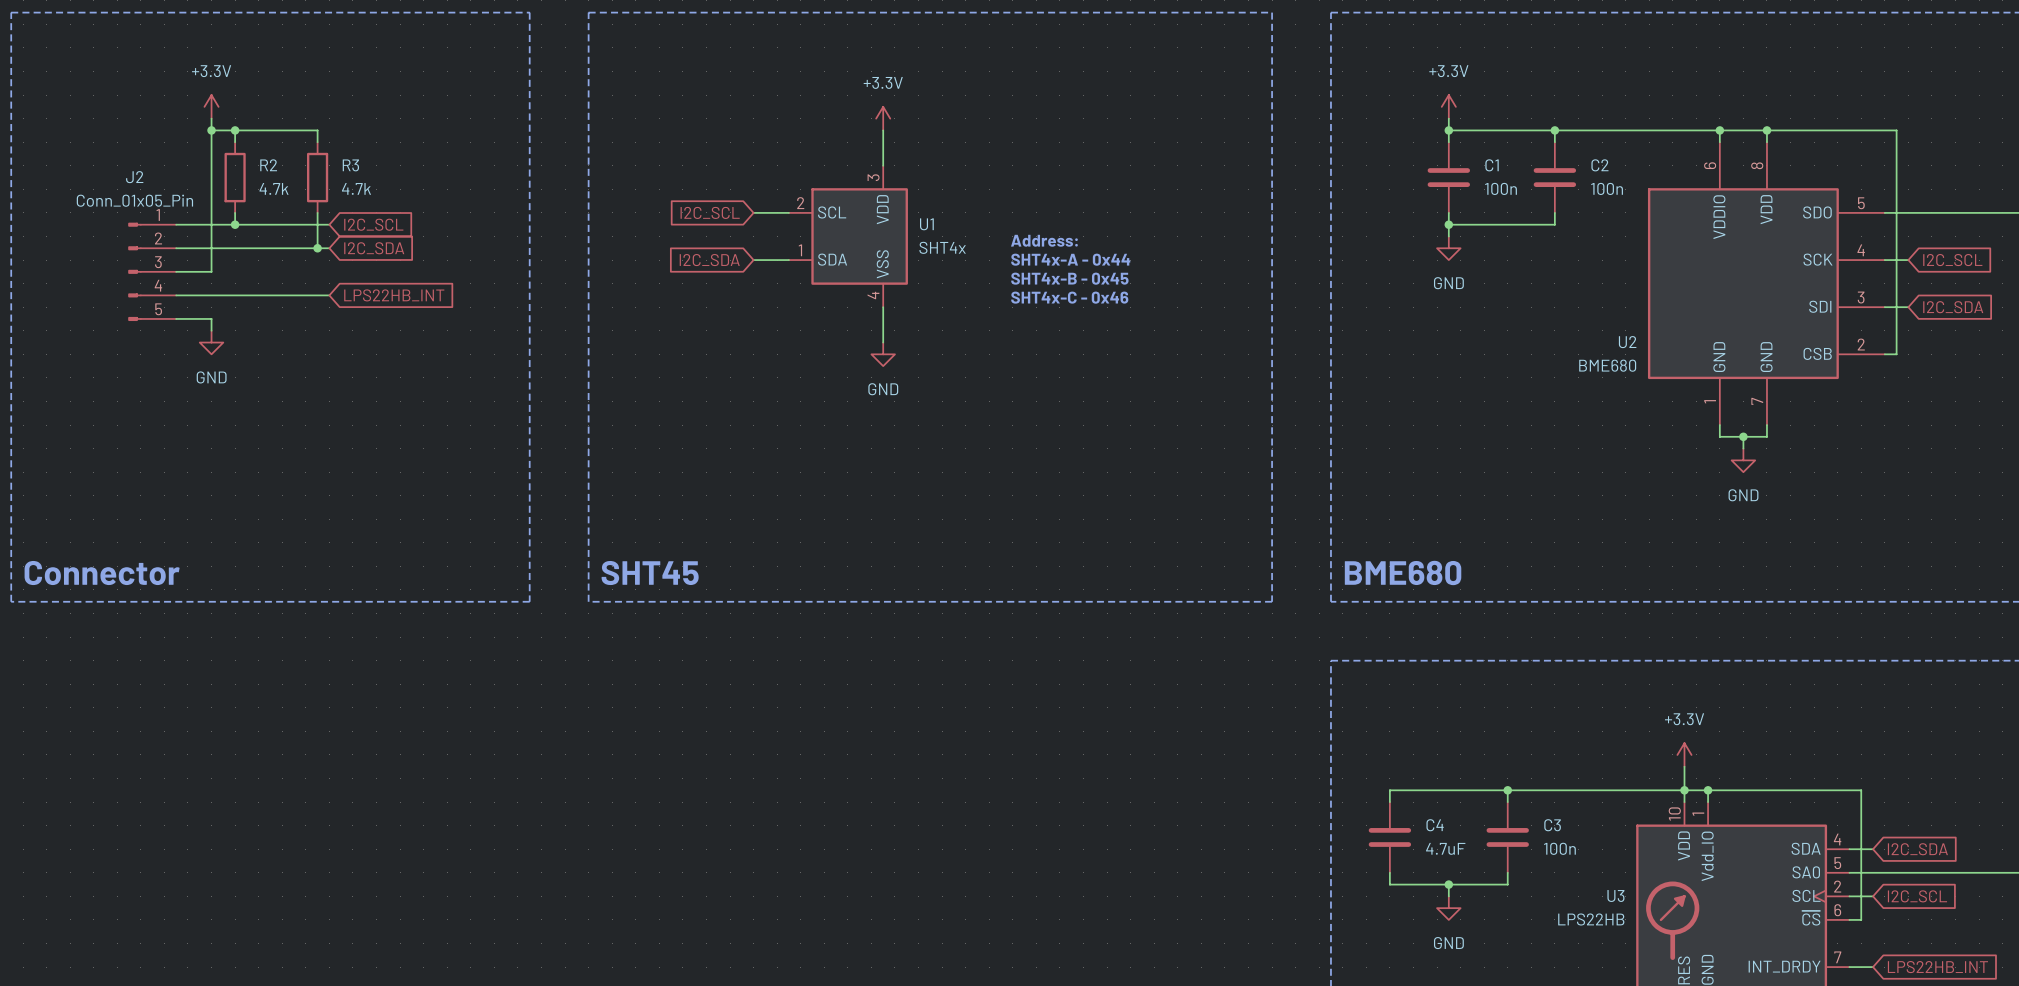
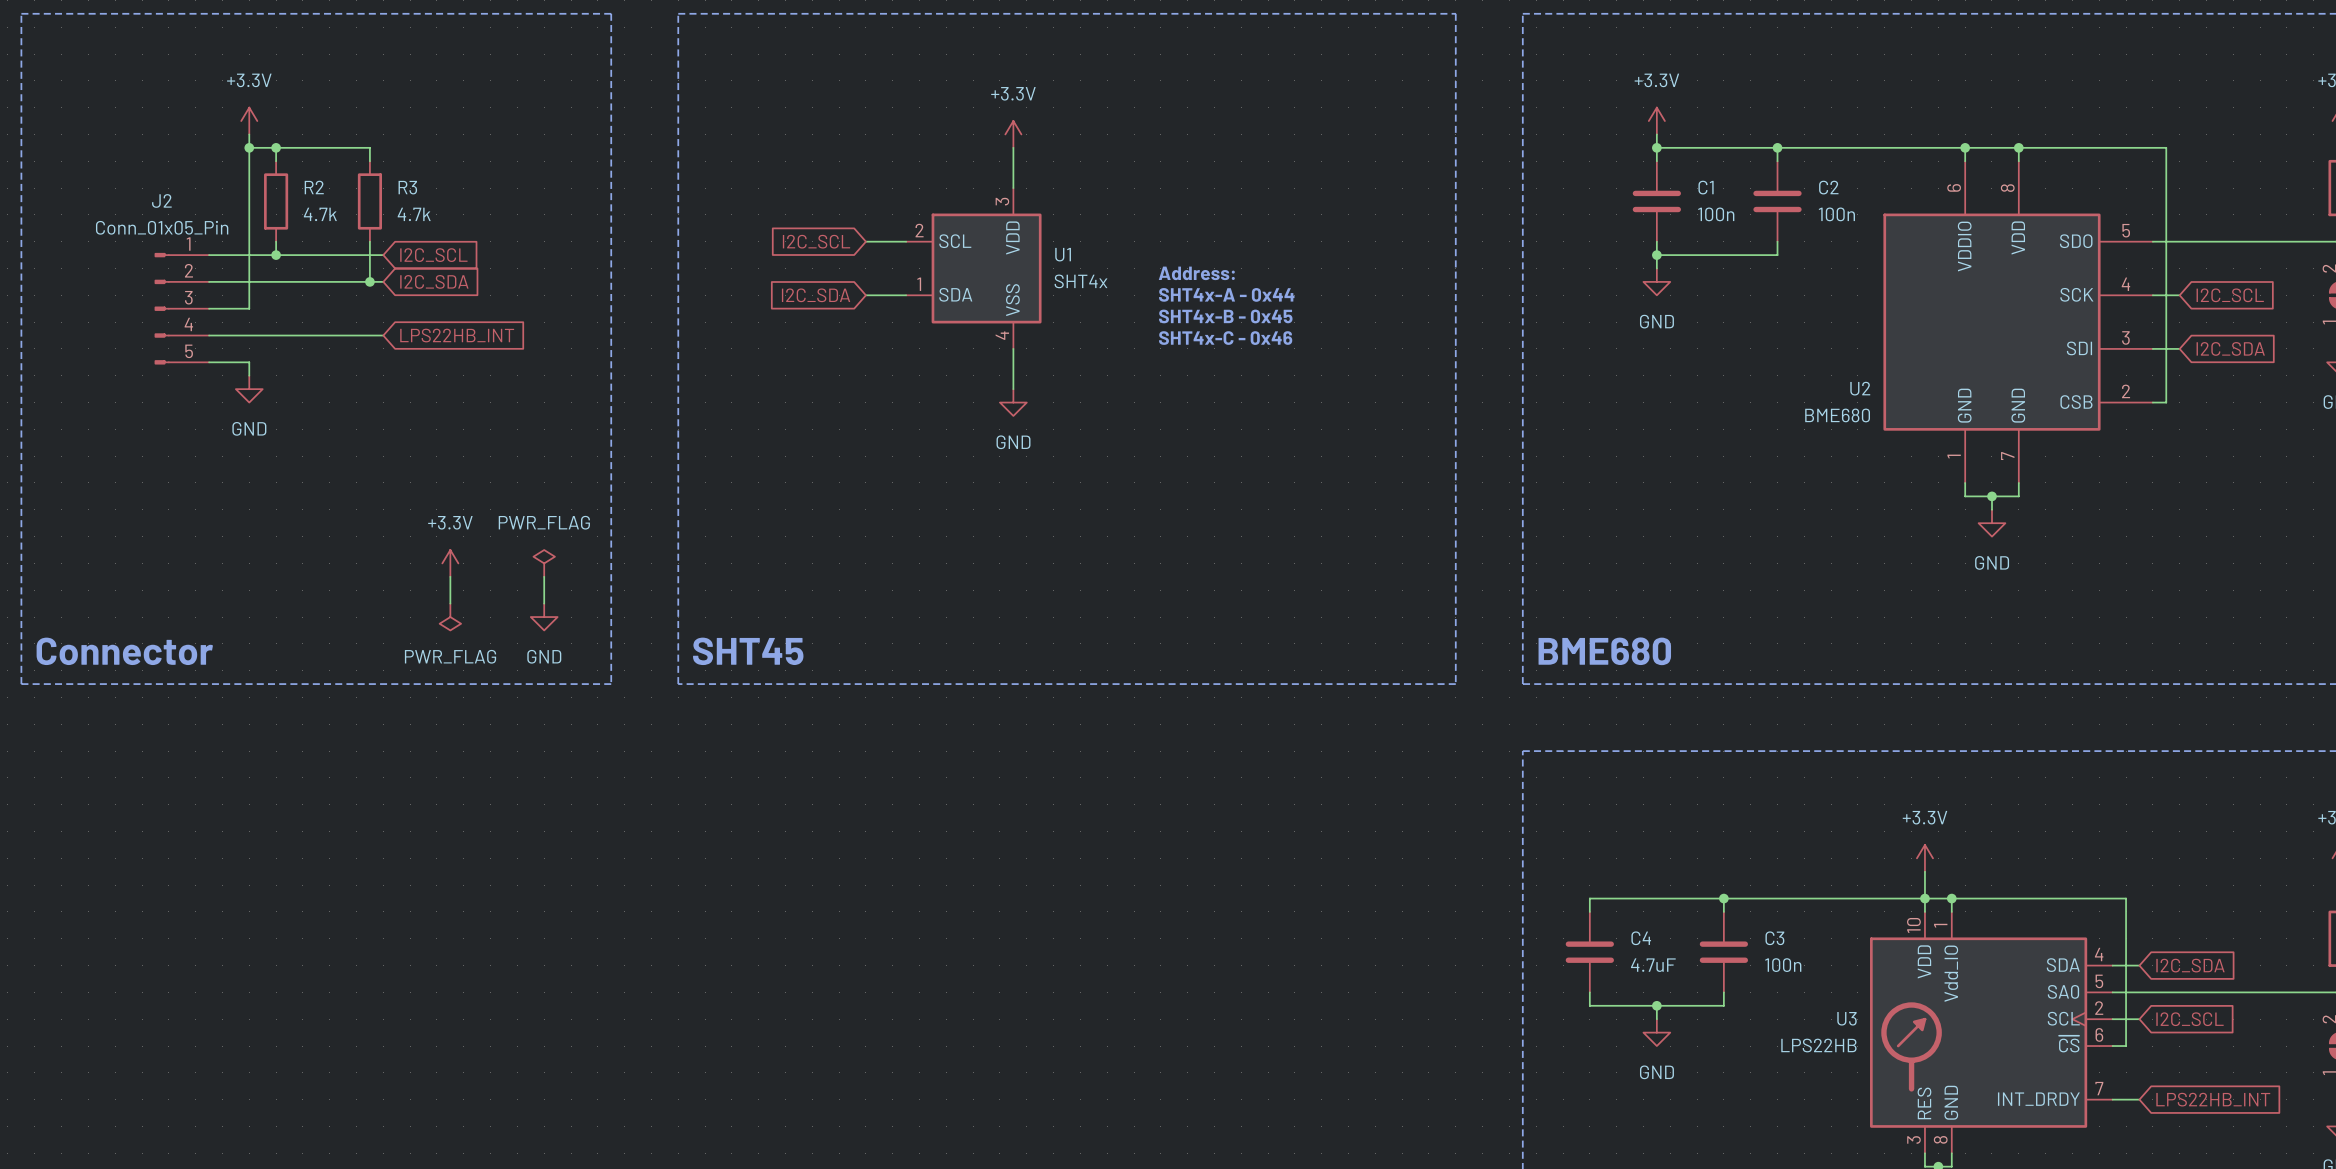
power symbol: none -> +3.3V (450, 563)
power symbol: none -> PWR_FLAG (544, 563)
wire: none -> (450, 576) (450, 603)
wire: none -> (544, 576) (544, 603)
power symbol: none -> PWR_FLAG (450, 617)
power symbol: none -> GND (544, 617)

